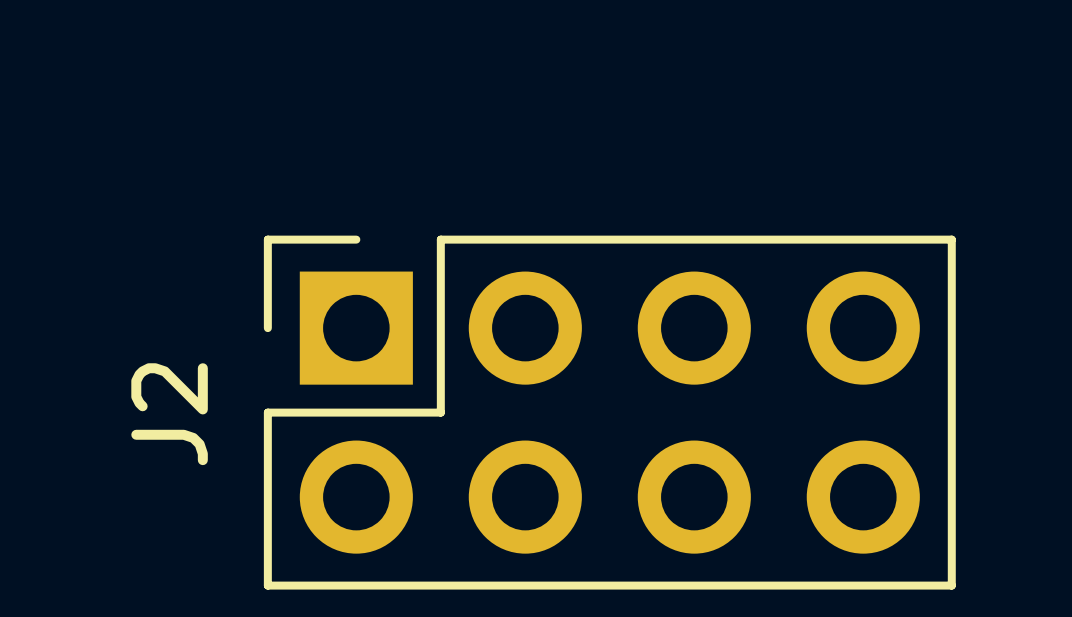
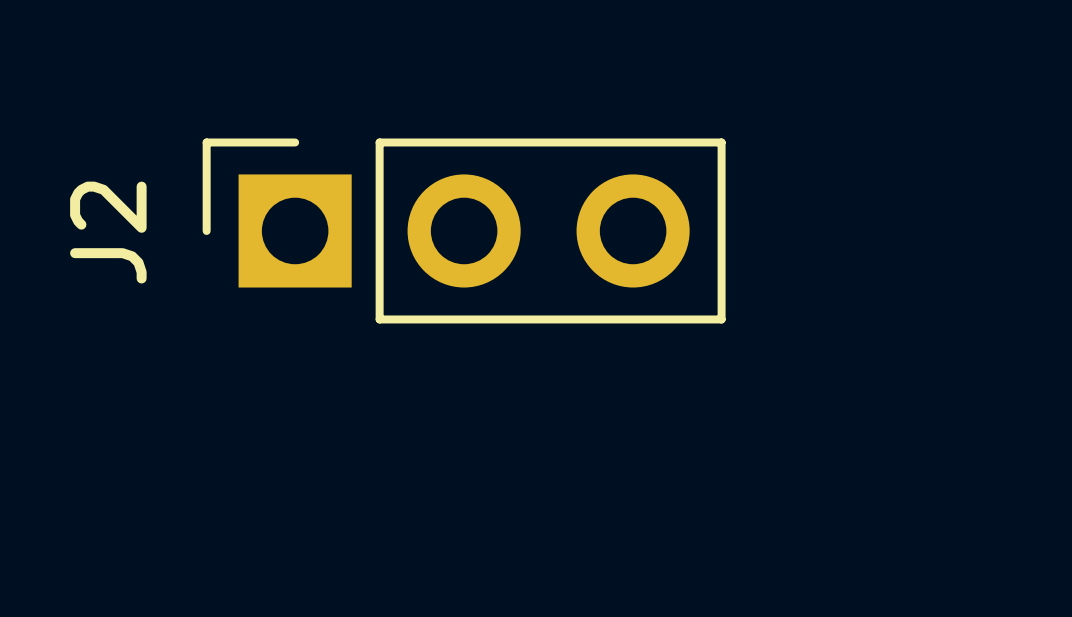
J2 footprint: [263, 235, 956, 590] -> [202, 138, 726, 324]

